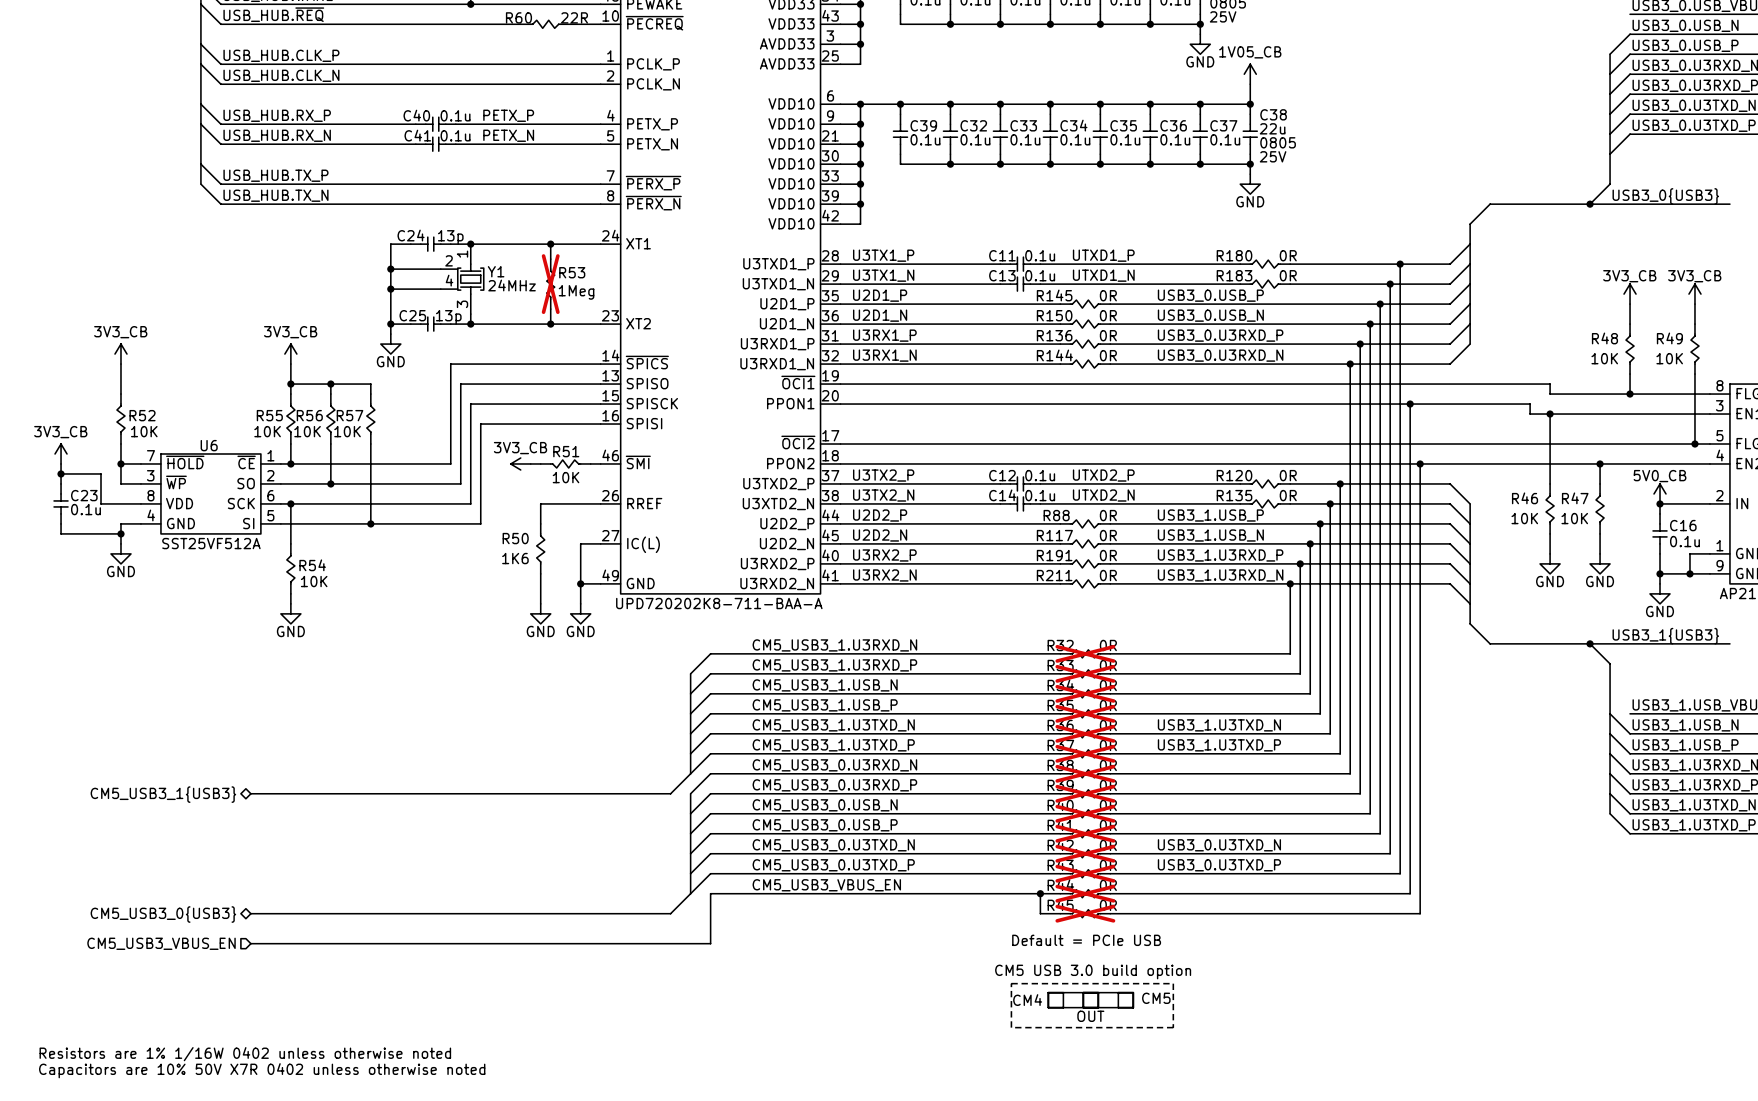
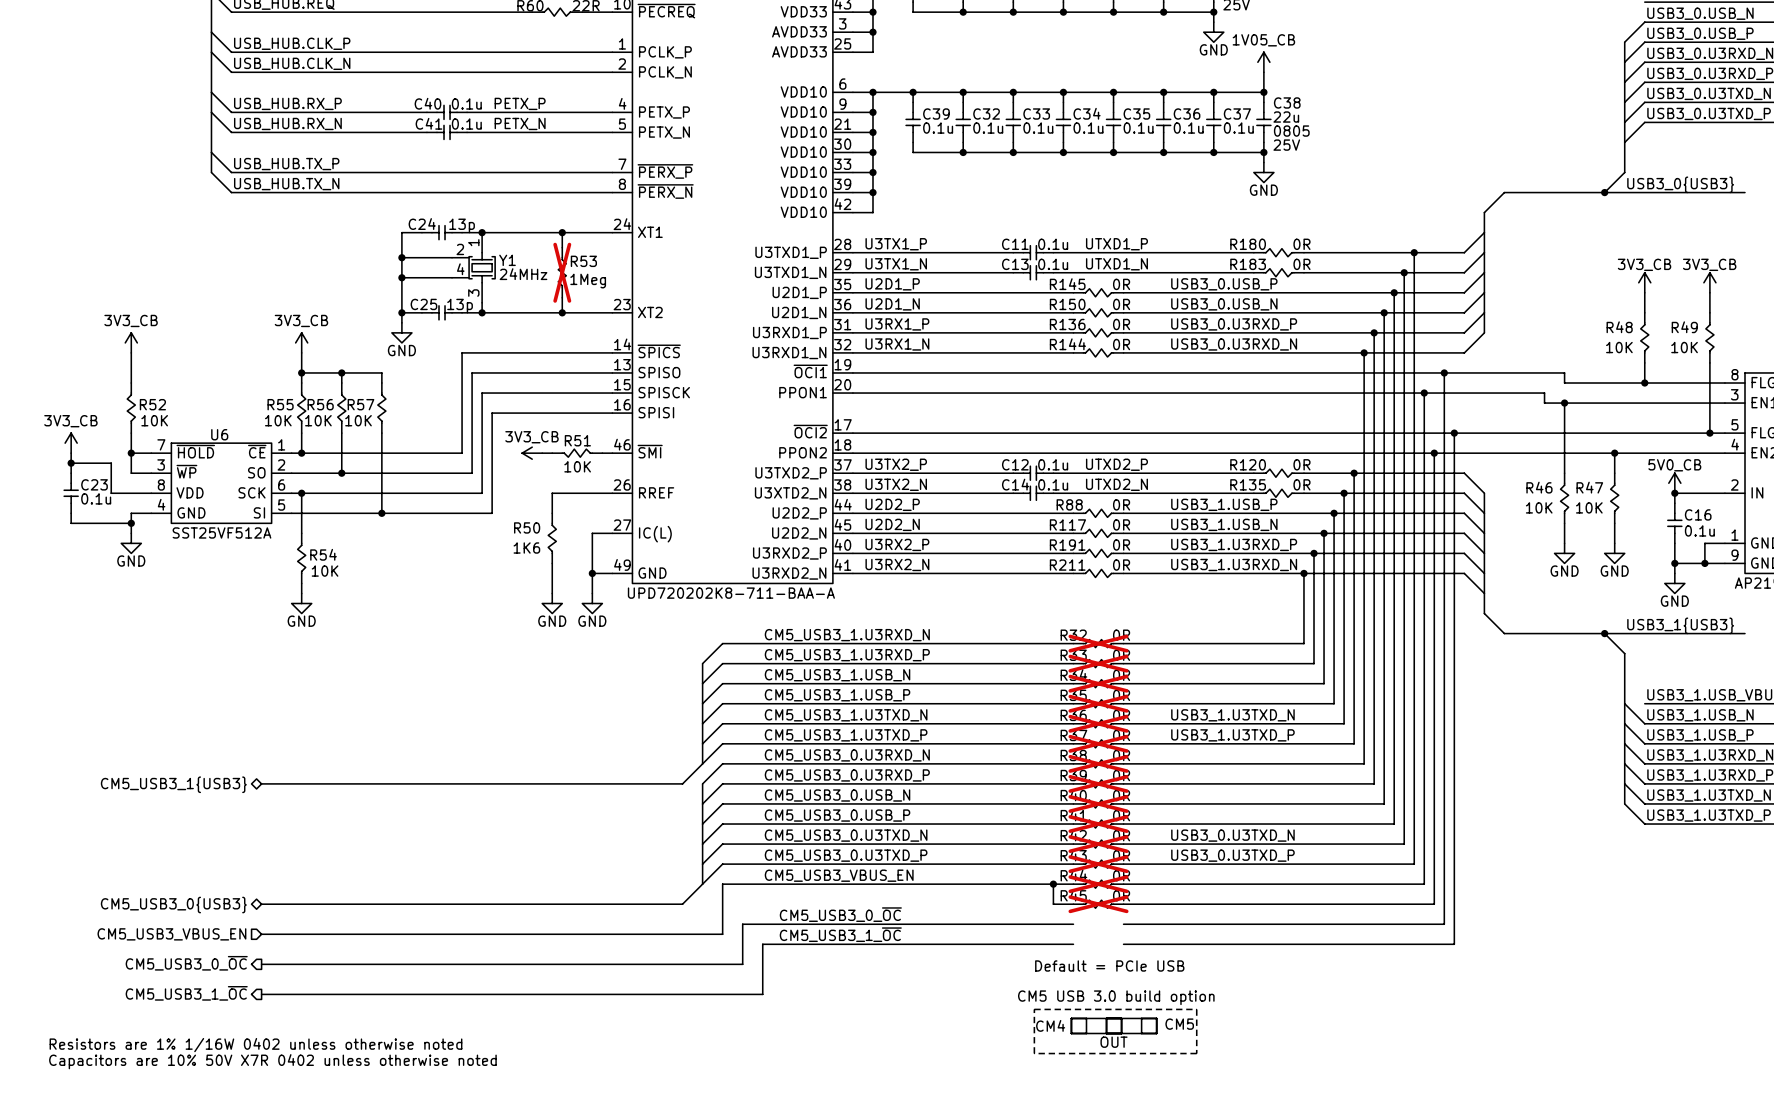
wire: none -> (1444, 372) (1444, 924) (1123, 924)
junction: none -> (1444, 372)
wire: none -> (1454, 433) (1454, 944) (1123, 944)
junction: none -> (1454, 433)
label: none -> CM5_USB3_0_~{OC} (840, 914)
wire: none -> (1073, 924) (742, 924) (742, 964) (261, 964)
text position: Default = PCIe USB (1086, 940) -> Default = PCIe USB (1109, 966)
label: none -> CM5_USB3_1_~{OC} (840, 934)
wire: none -> (1073, 944) (762, 944) (762, 994) (261, 994)
text position: CM5 USB 3.0 build option (1093, 971) -> CM5 USB 3.0 build option (1116, 997)
hierarchical label: none -> CM5_USB3_0_~{OC} (186, 963)
line: (1011, 983) (1173, 983) (1173, 1027) (1011, 1027) (1011, 983) -> (1034, 1009) (1196, 1009) (1196, 1053) (1034, 1053) (1034, 1009)
line: (1048, 992) (1133, 992) (1133, 1007) (1048, 1007) (1048, 992) -> (1071, 1018) (1156, 1018) (1156, 1033) (1071, 1033) (1071, 1018)
line: (1063, 992) (1063, 1007) -> (1086, 1018) (1086, 1033)
line: (1083, 992) (1083, 1007) -> (1106, 1018) (1106, 1033)
line: (1098, 992) (1098, 1007) -> (1121, 1018) (1121, 1033)
line: (1118, 992) (1118, 1007) -> (1141, 1018) (1141, 1033)
text position: CM5 (1156, 998) -> CM5 (1179, 1024)
text position: CM4 (1027, 1000) -> CM4 (1050, 1025)
hierarchical label: none -> CM5_USB3_1_~{OC} (186, 993)
text position: OUT (1090, 1016) -> OUT (1114, 1042)

